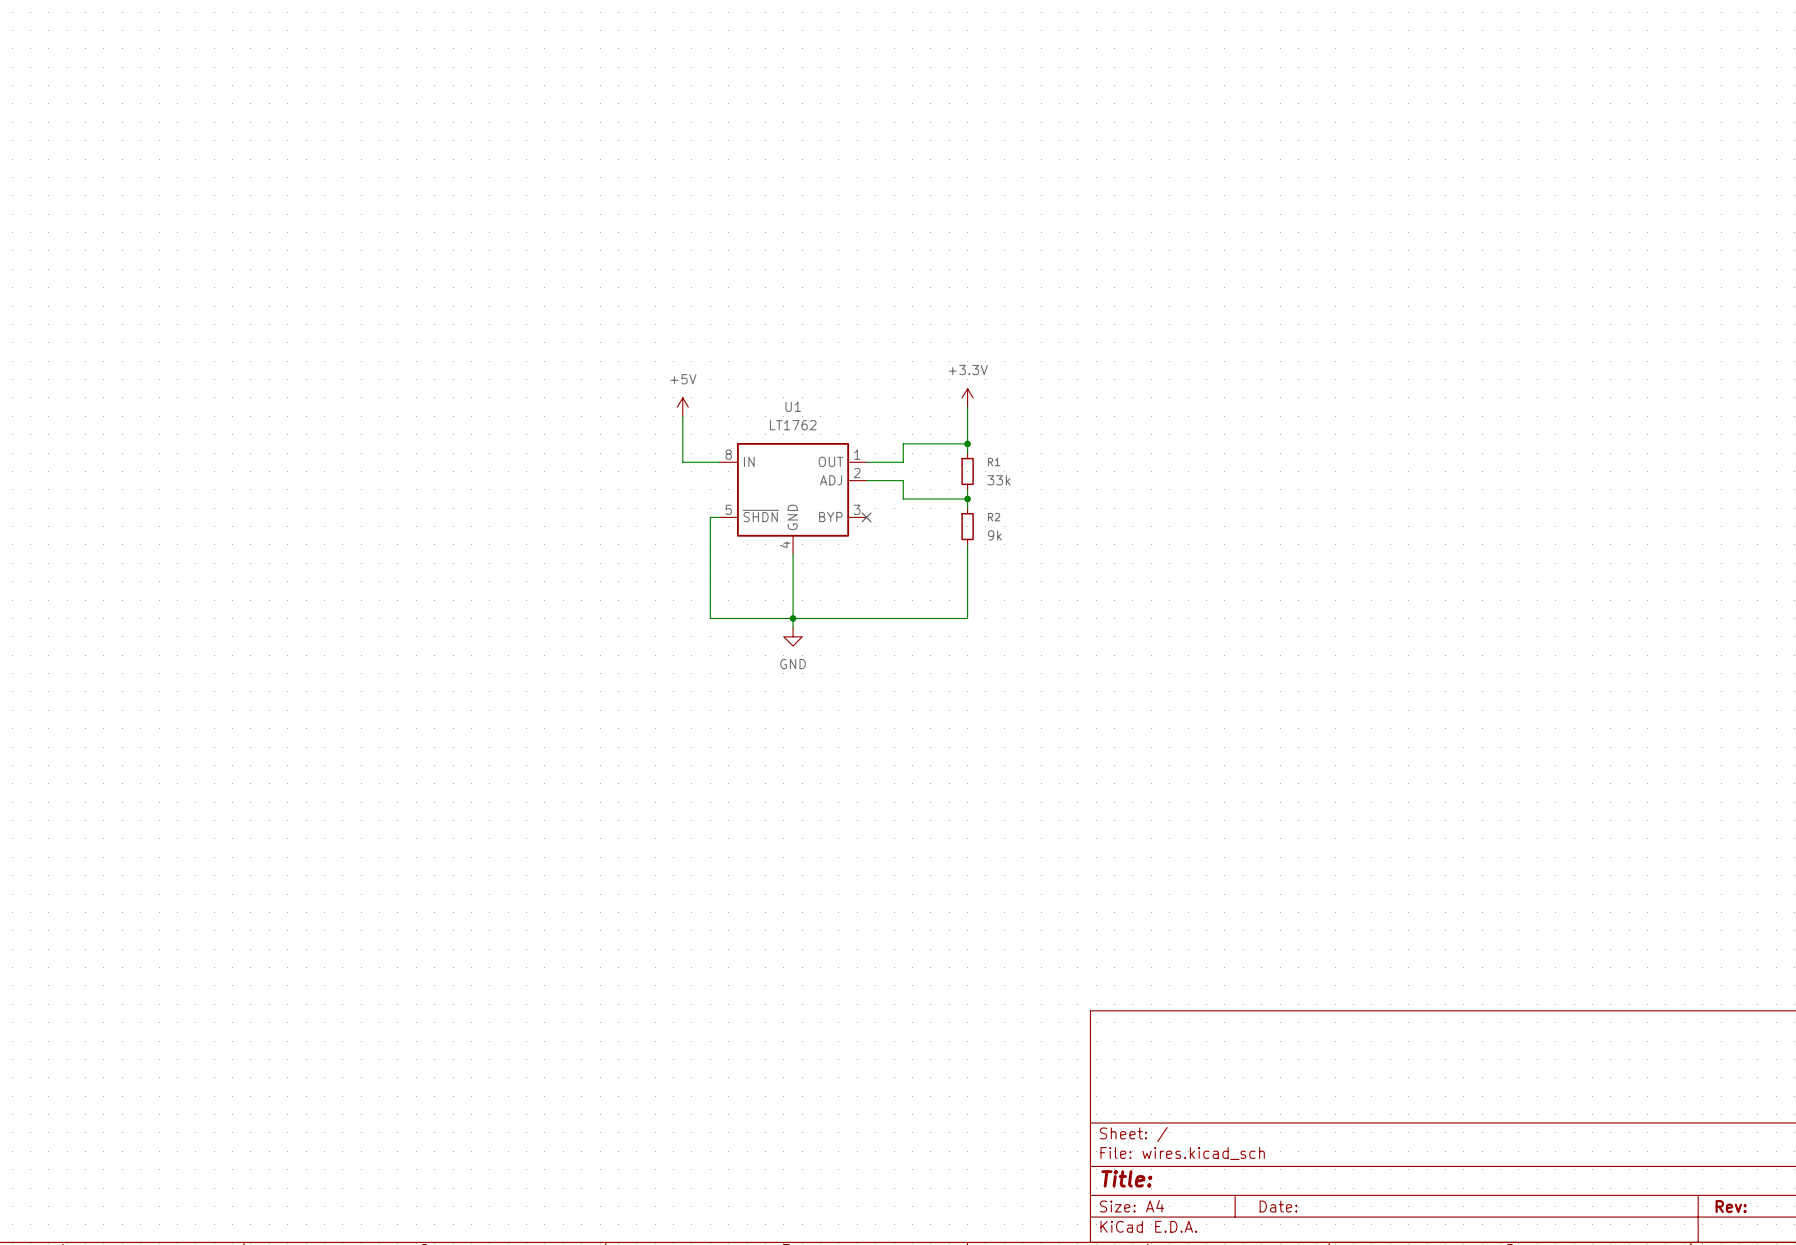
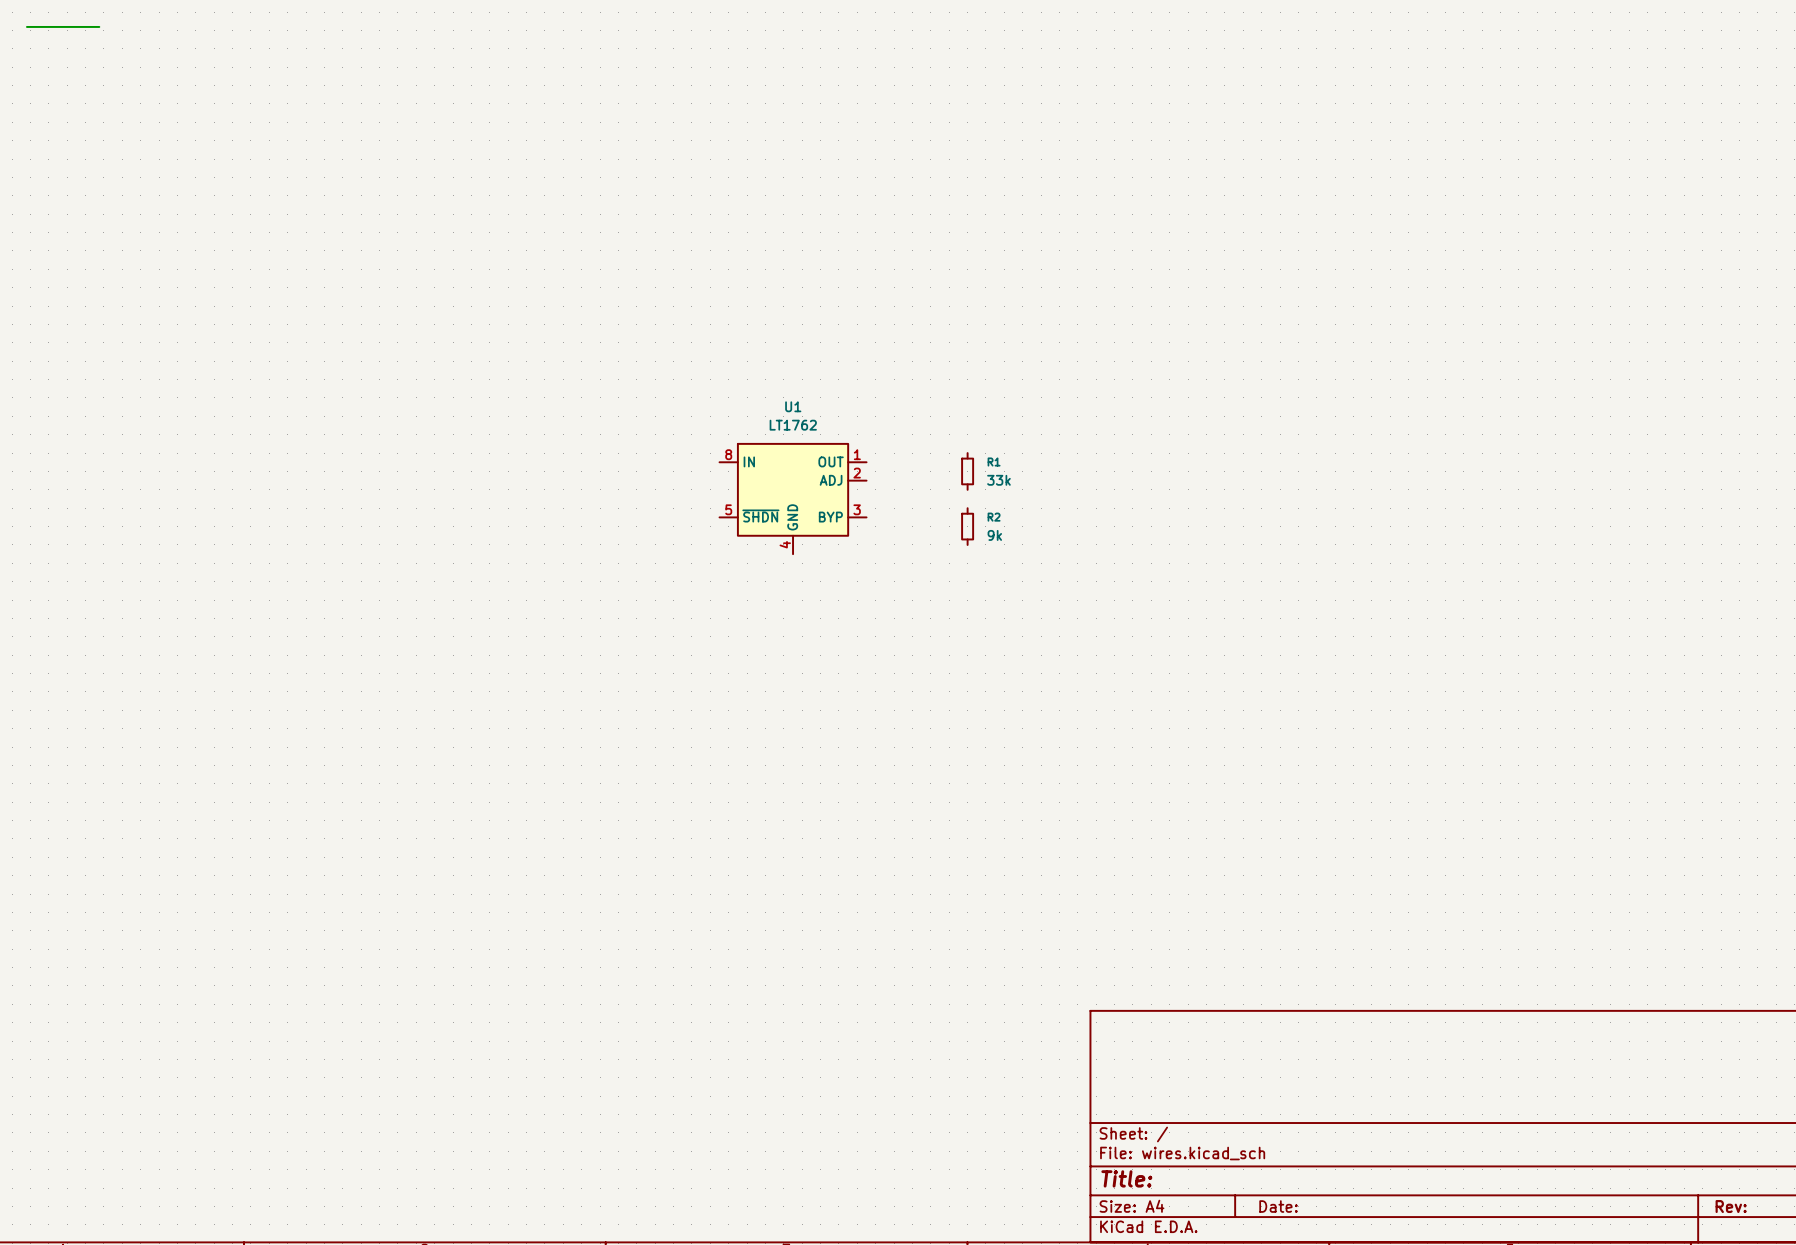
wire: none -> (26, 26) (99, 26)
power symbol: +3.3V (967, 397) -> none
power symbol: +5V (682, 407) -> none
wire: (967, 407) (967, 453) -> none
wire: (682, 416) (682, 462) (719, 462) -> none
wire: (967, 443) (903, 443) (903, 462) (866, 462) -> none
junction: (967, 443) -> none
wire: (866, 480) (903, 480) (903, 499) (967, 499) -> none
wire: (967, 489) (967, 508) -> none
junction: (967, 499) -> none
wire: (719, 517) (710, 517) (710, 618) (967, 618) (967, 544) -> none
no-connect mark: (866, 517) -> none
wire: (793, 554) (793, 627) -> none
junction: (793, 618) -> none
power symbol: GND (793, 636) -> none

